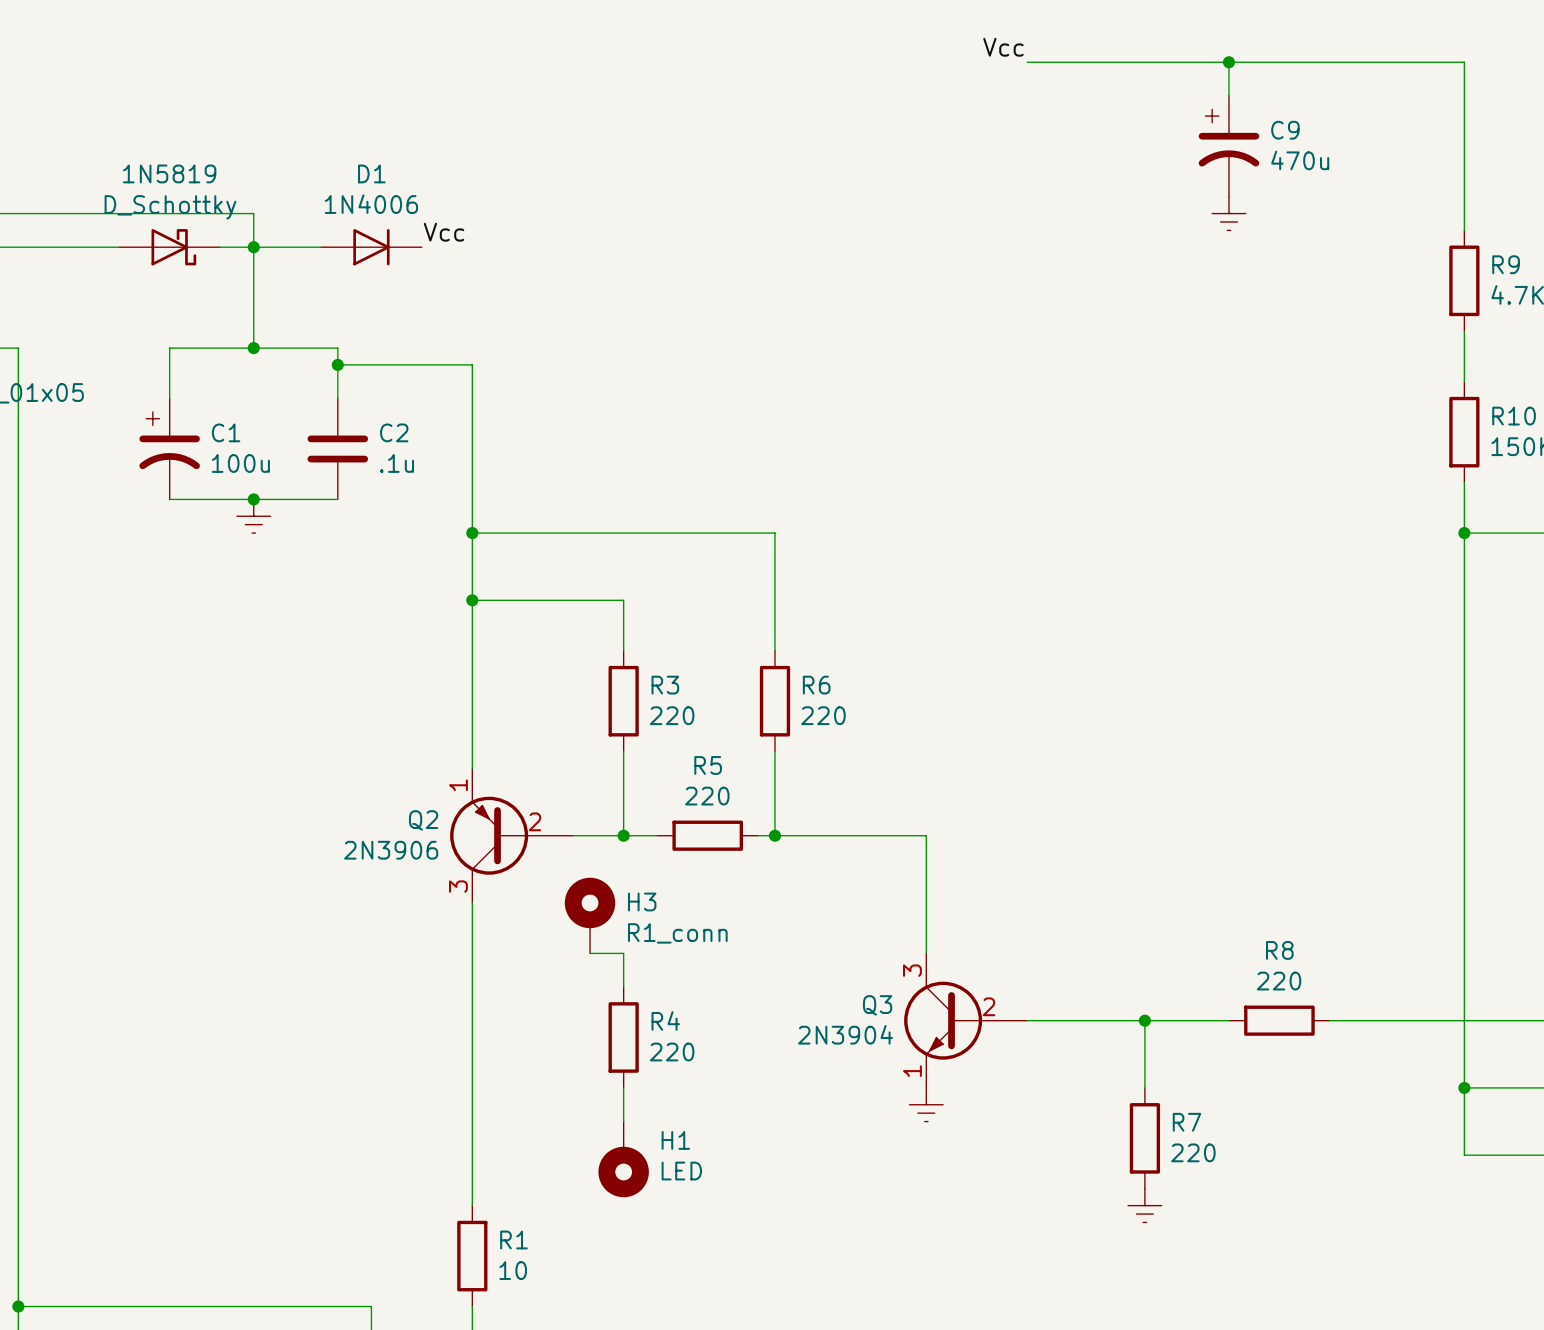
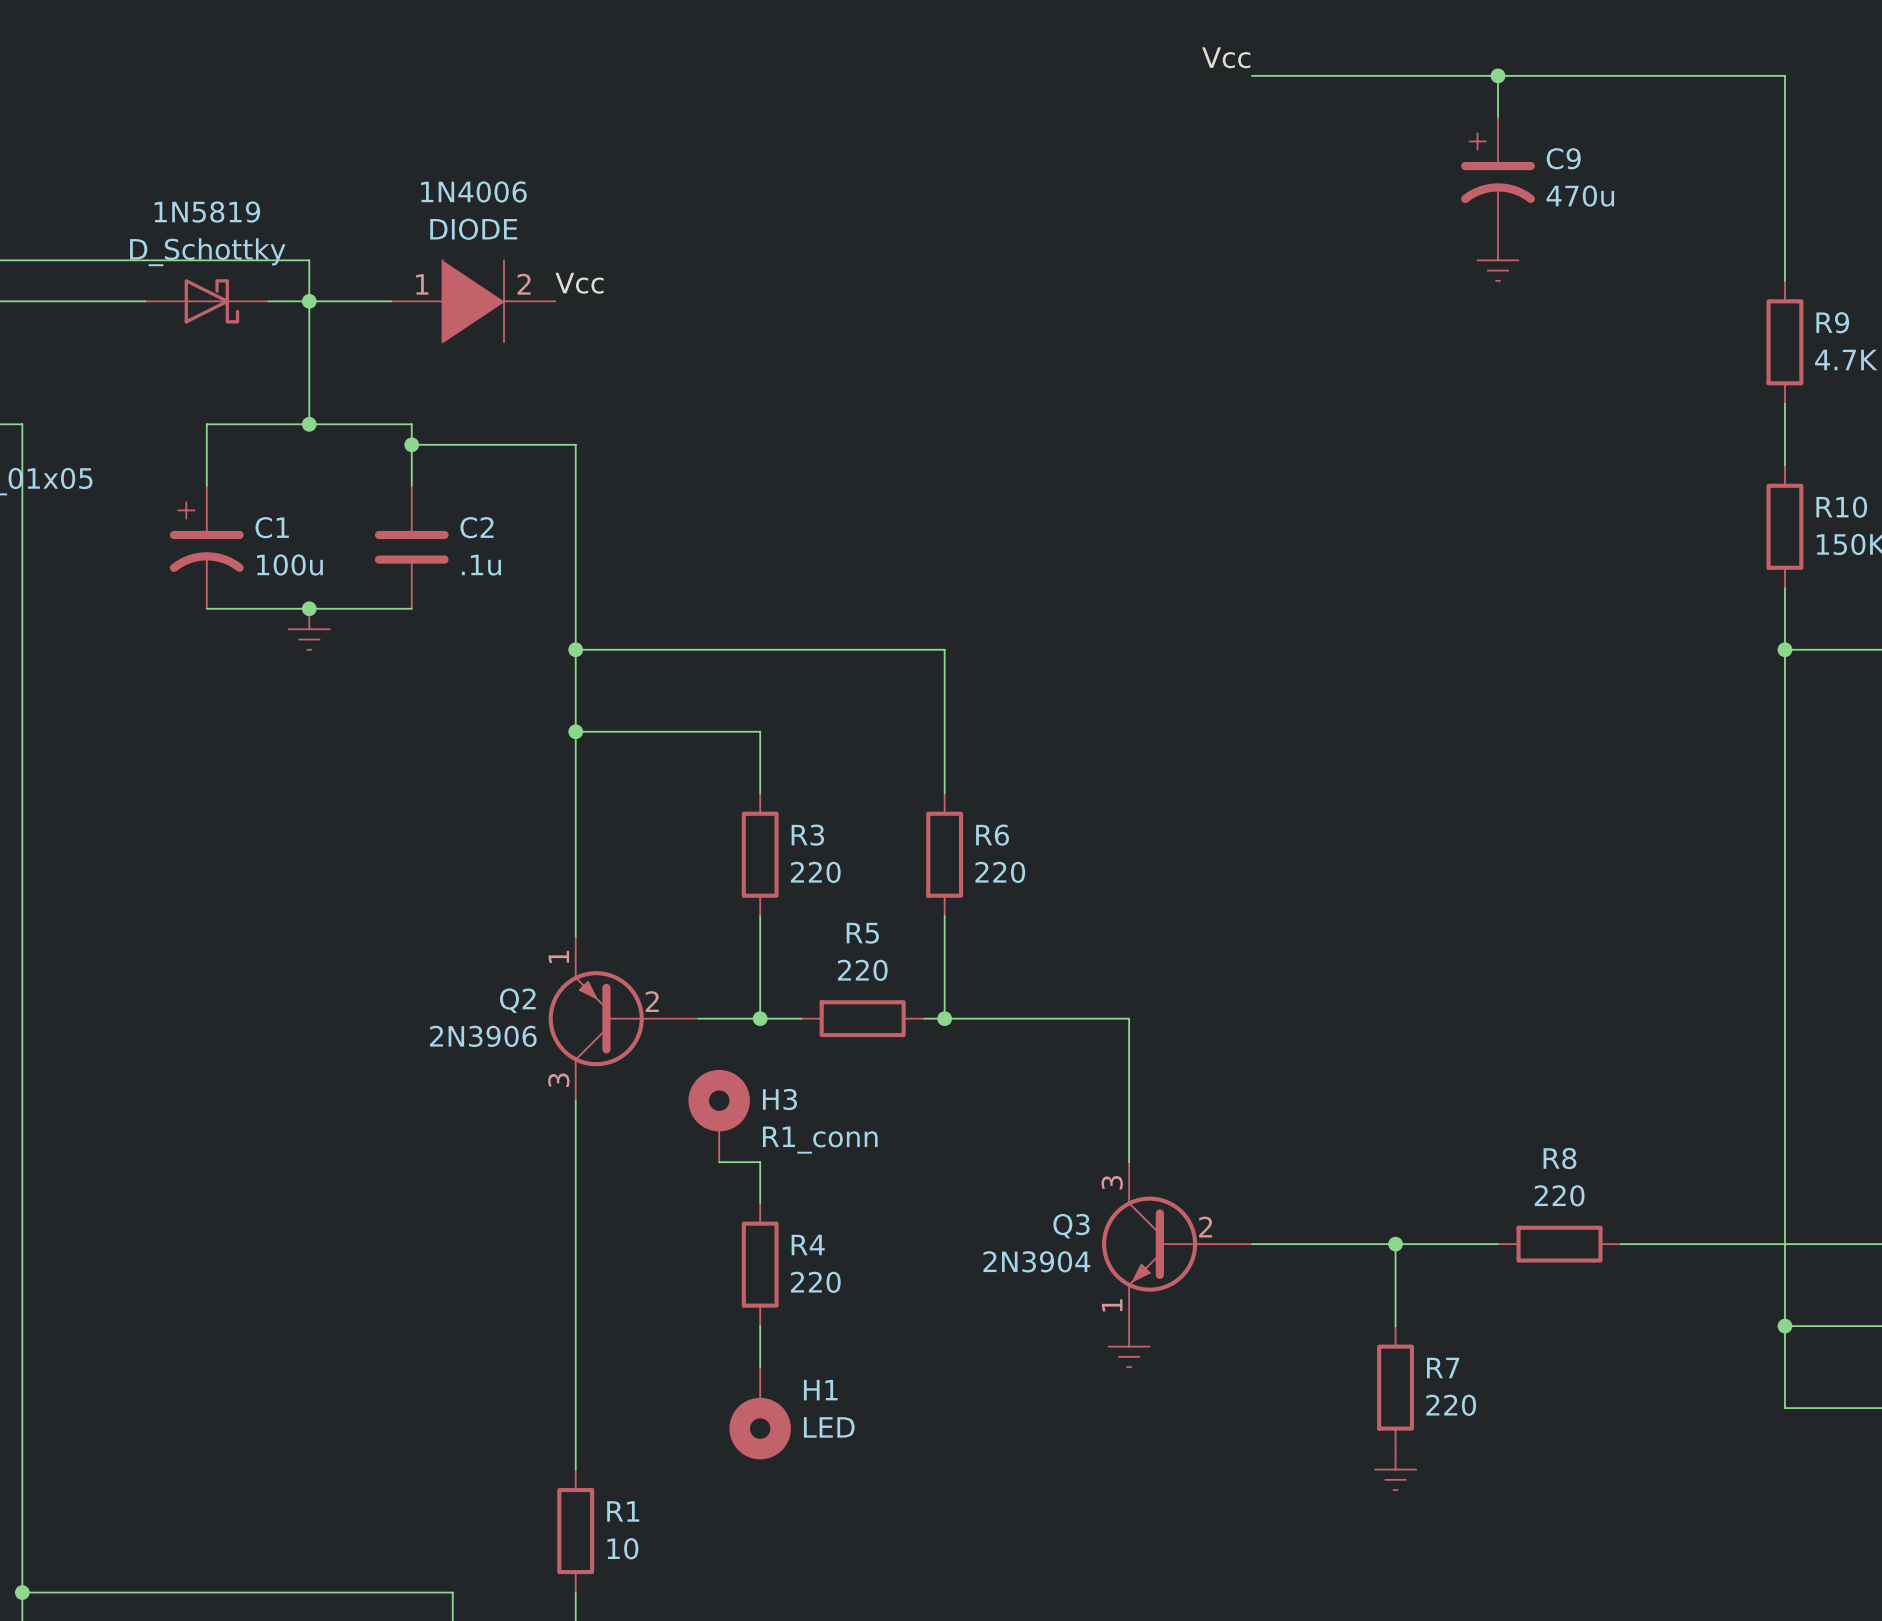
label position: Vcc (444, 232) -> Vcc (579, 283)
D1: 1N4006 (371, 247) -> none
1N4006: none -> DIODE (473, 301)

